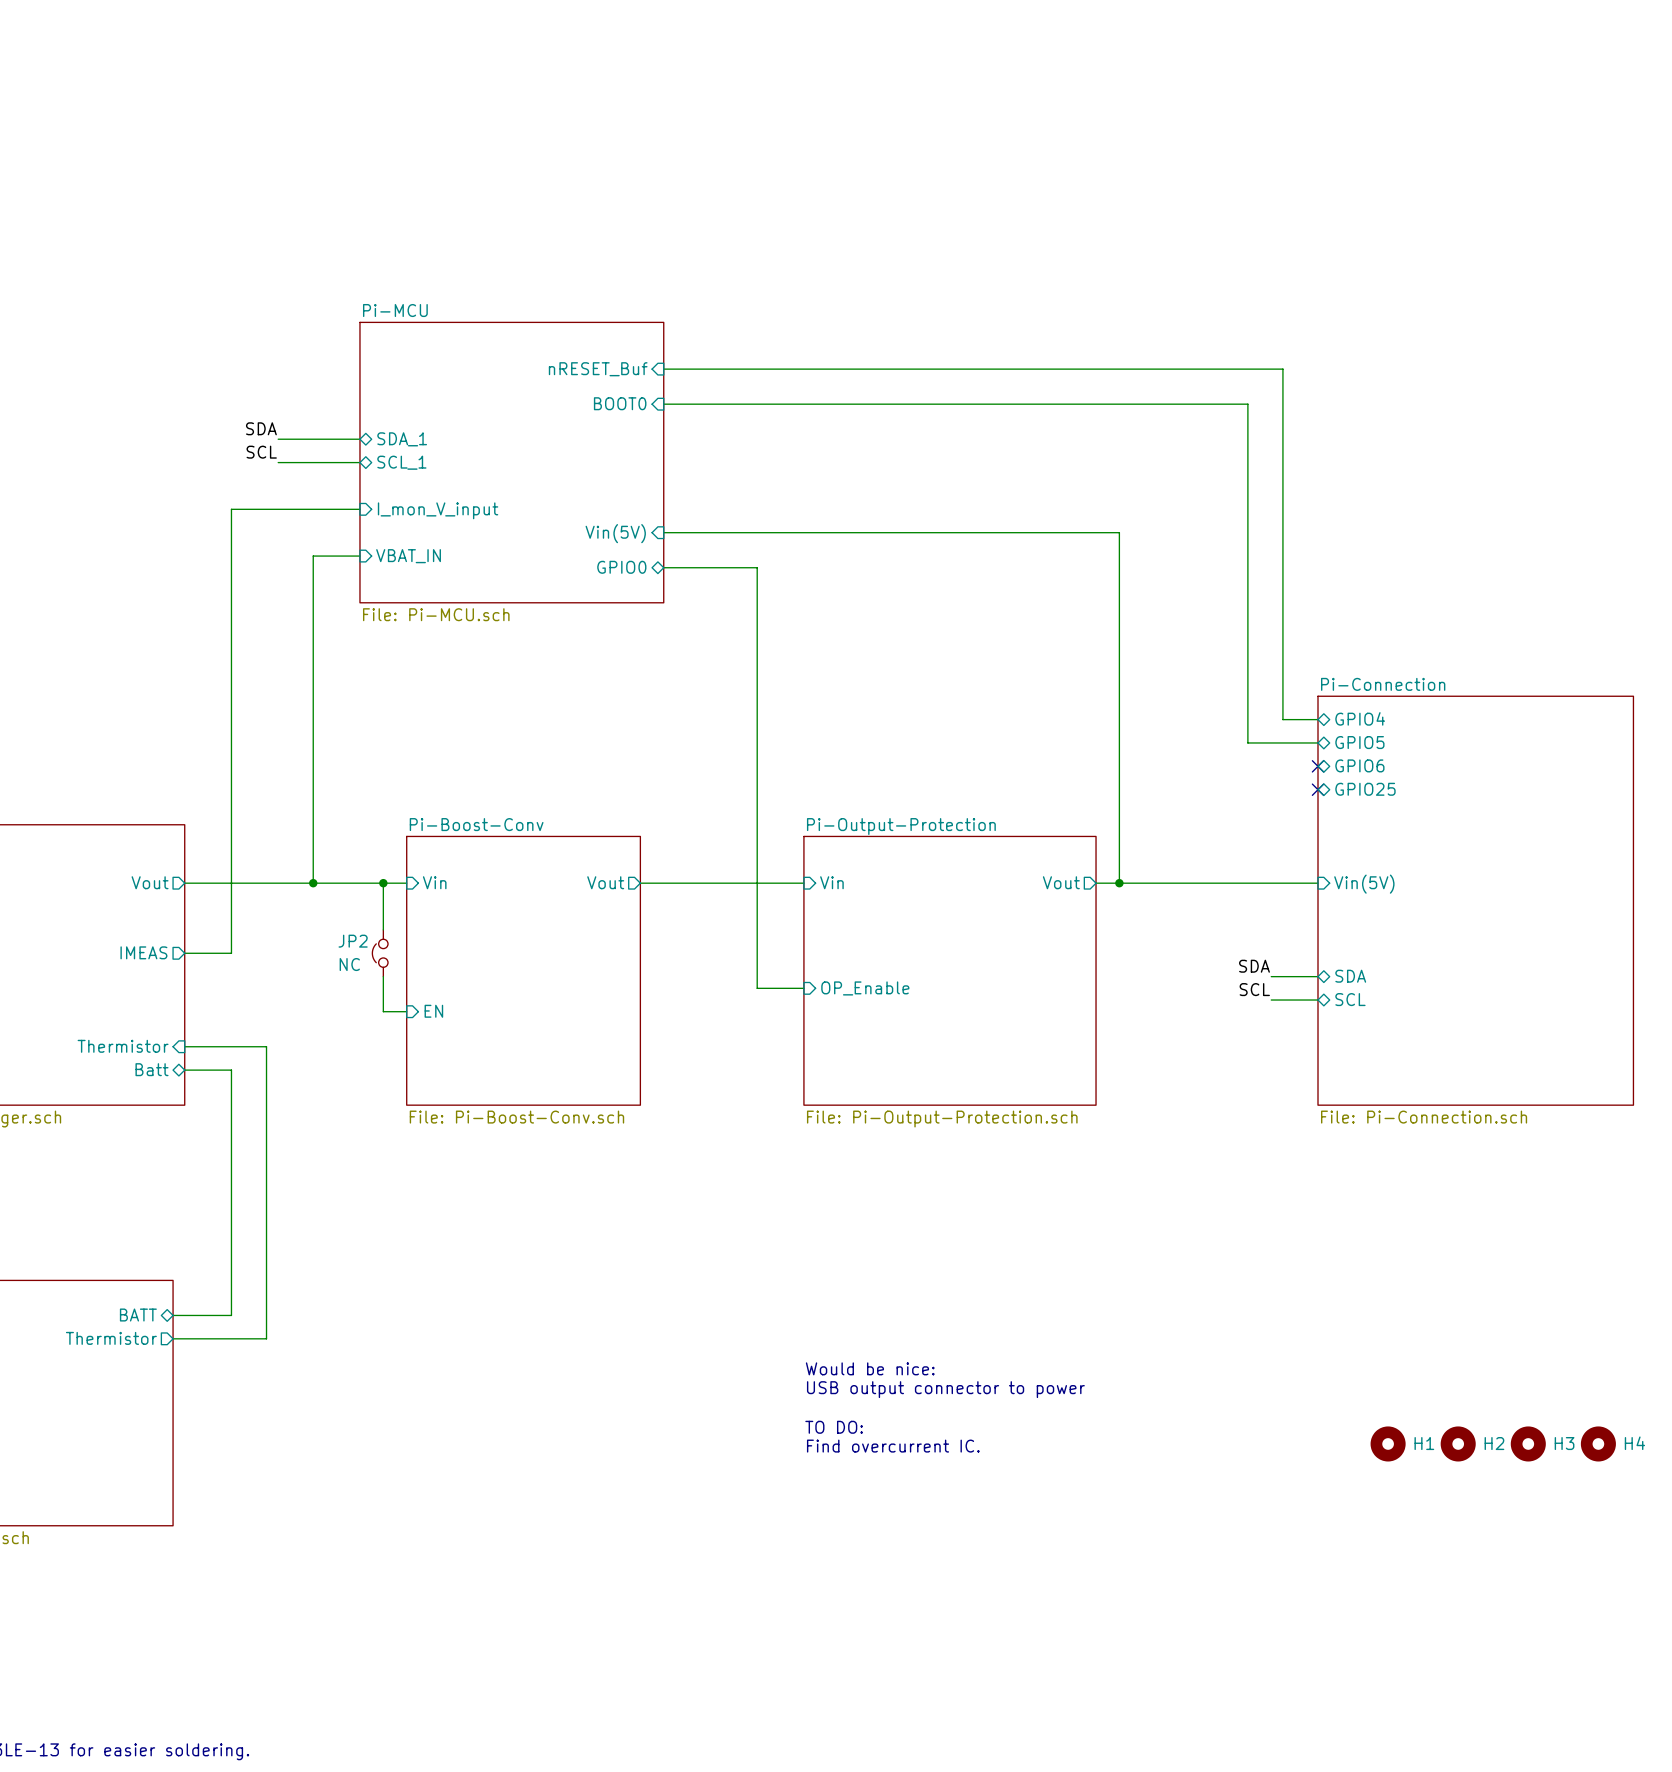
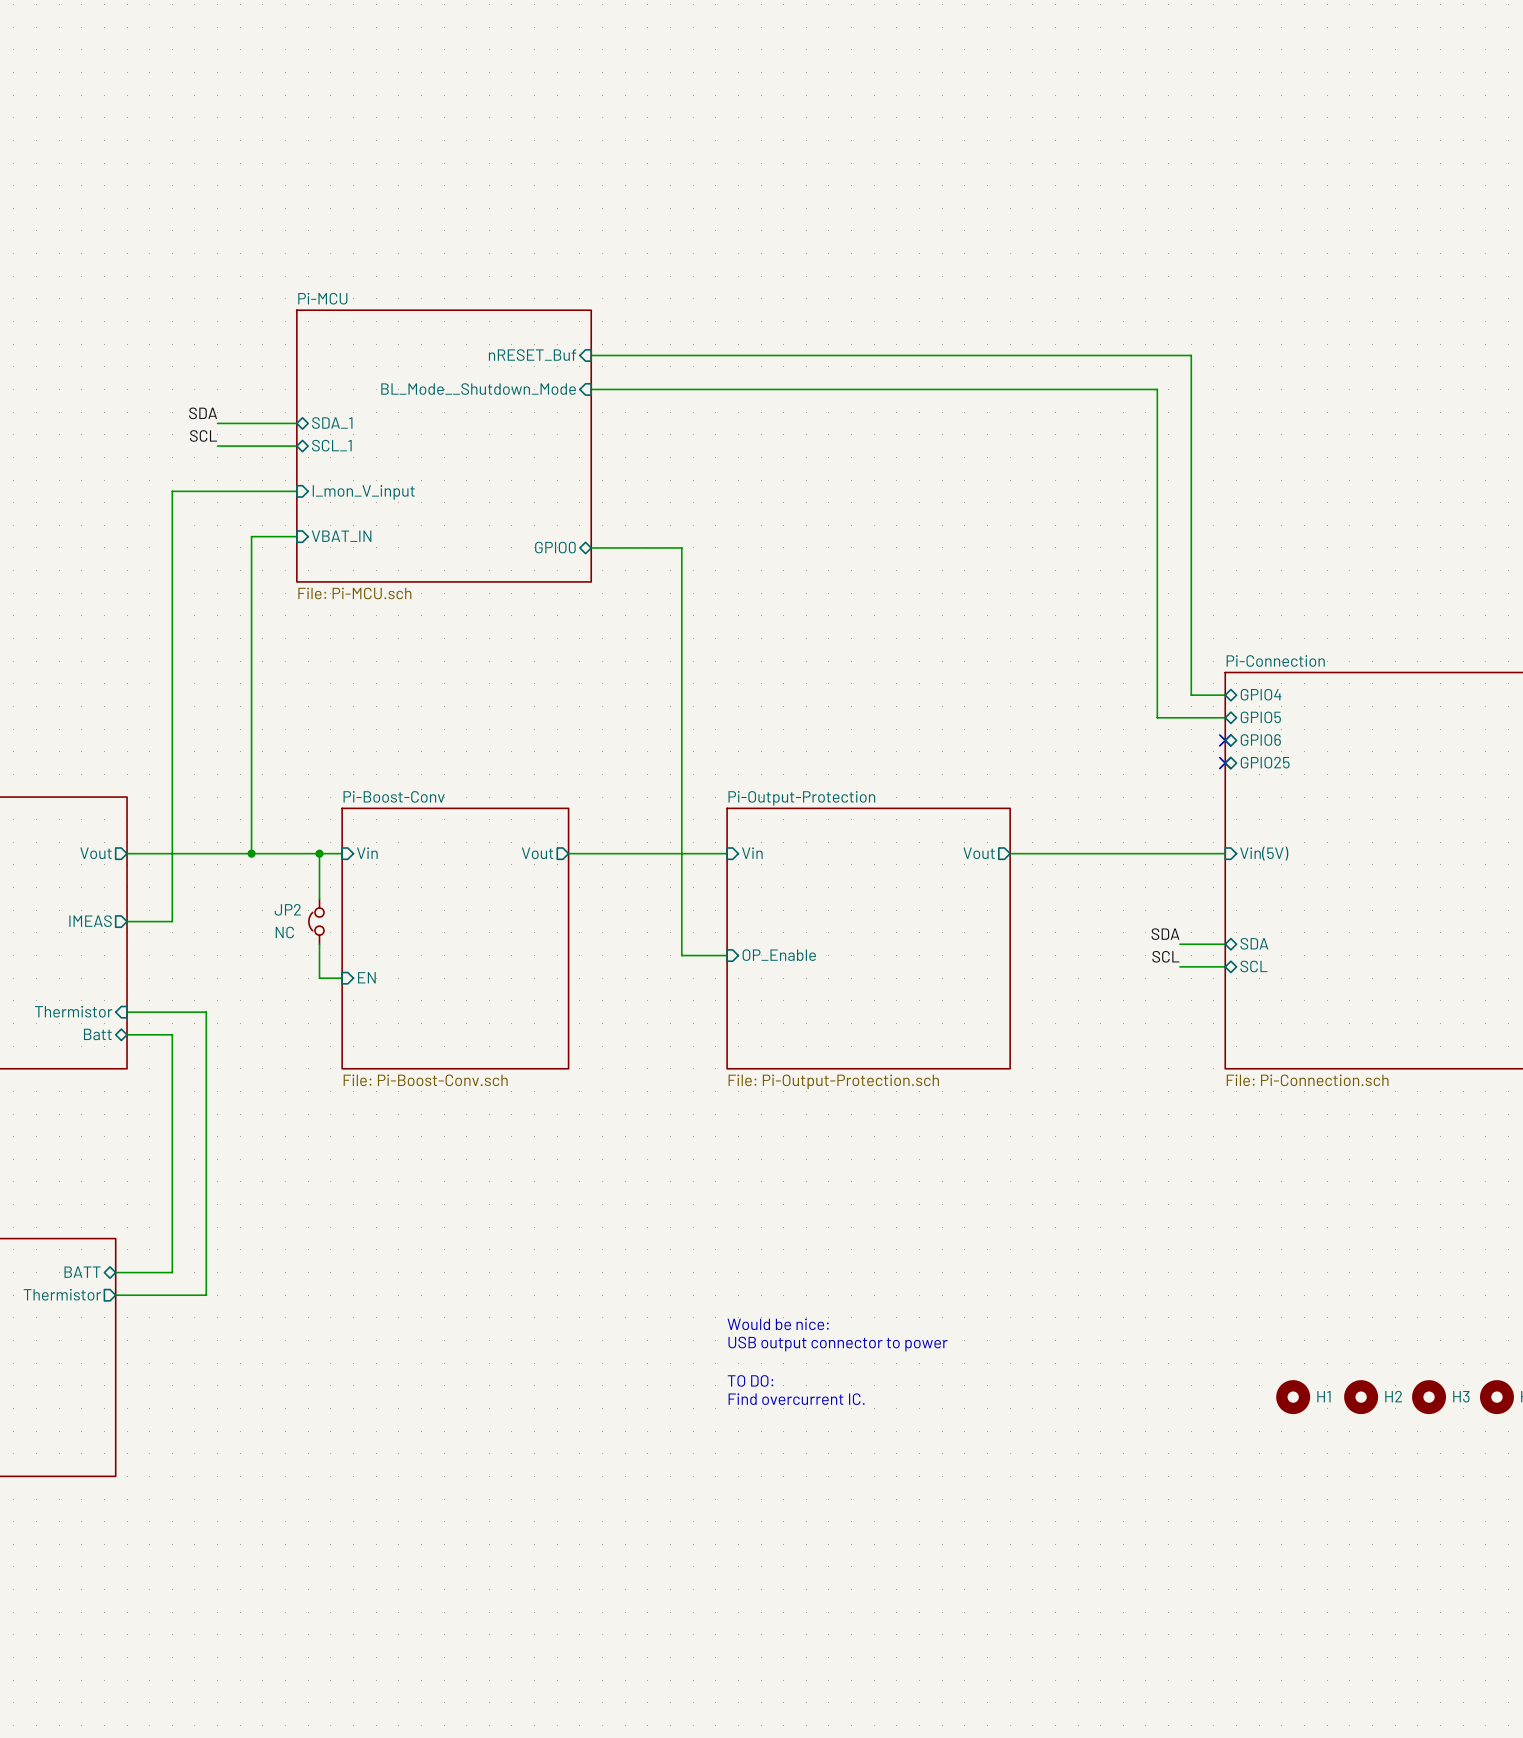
sheet pin: BOOT0 (620, 403) -> BL_Mode__Shutdown_Mode (478, 389)
wire: (663, 532) (1119, 532) (1119, 883) -> none
sheet pin: Vin(5V) (615, 533) -> none
junction: (1119, 883) -> none

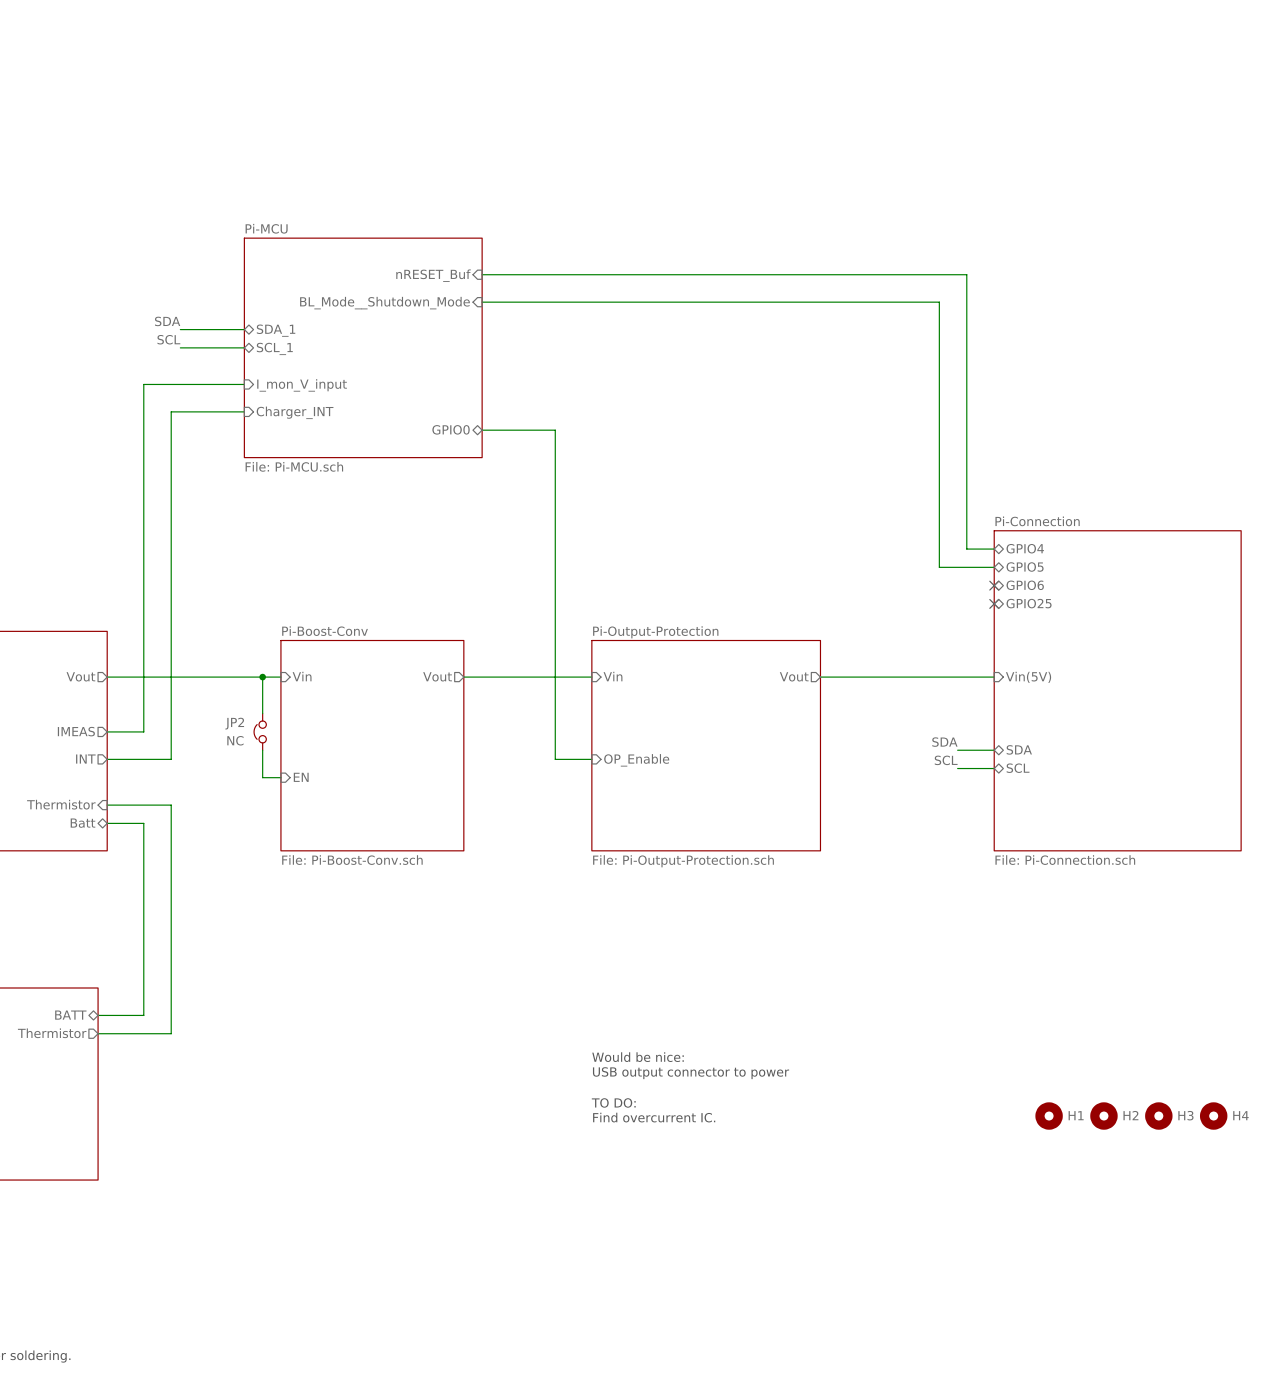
wire: none -> (244, 411) (171, 411) (171, 759) (107, 759)
sheet pin: none -> Charger_INT (295, 412)
wire: (296, 536) (251, 536) (251, 853) -> none
sheet pin: VBAT_IN (341, 536) -> none
junction: (251, 853) -> none
sheet pin: none -> INT (85, 759)

